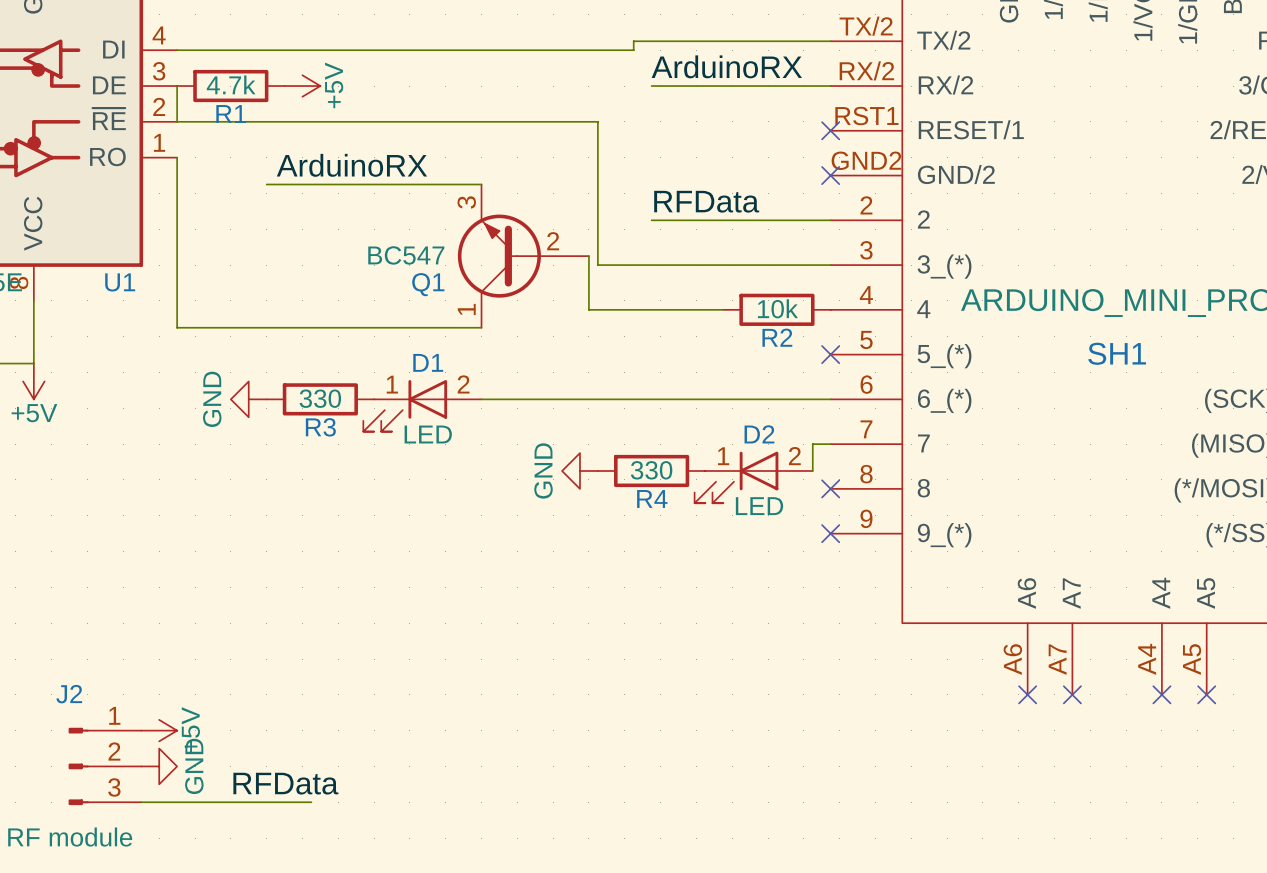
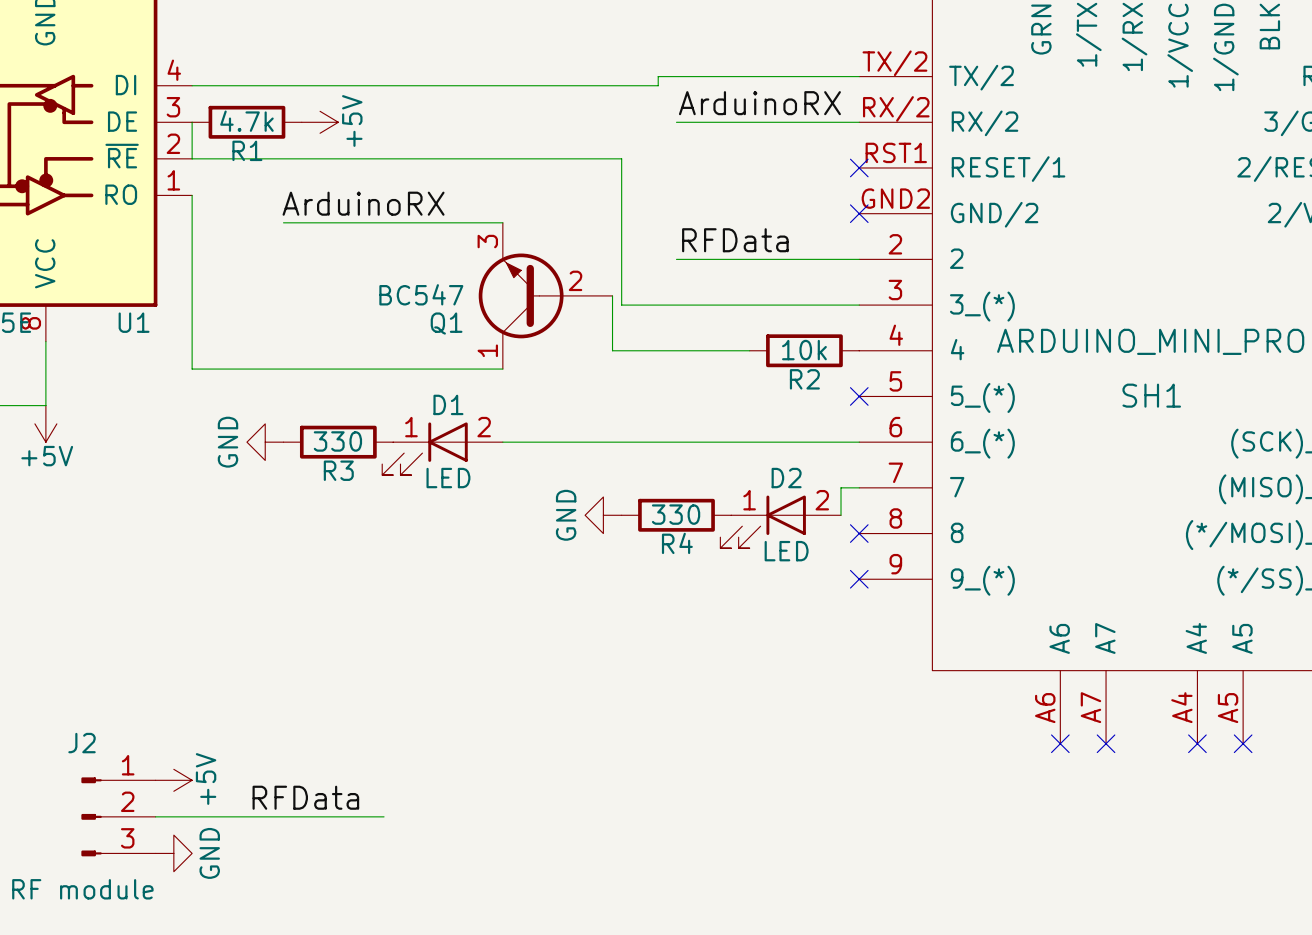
wire: none -> (155, 816) (384, 816)
power symbol position: GND (159, 766) -> GND (173, 853)
label position: RFData (285, 783) -> RFData (305, 797)
wire: (141, 802) (311, 802) -> none

